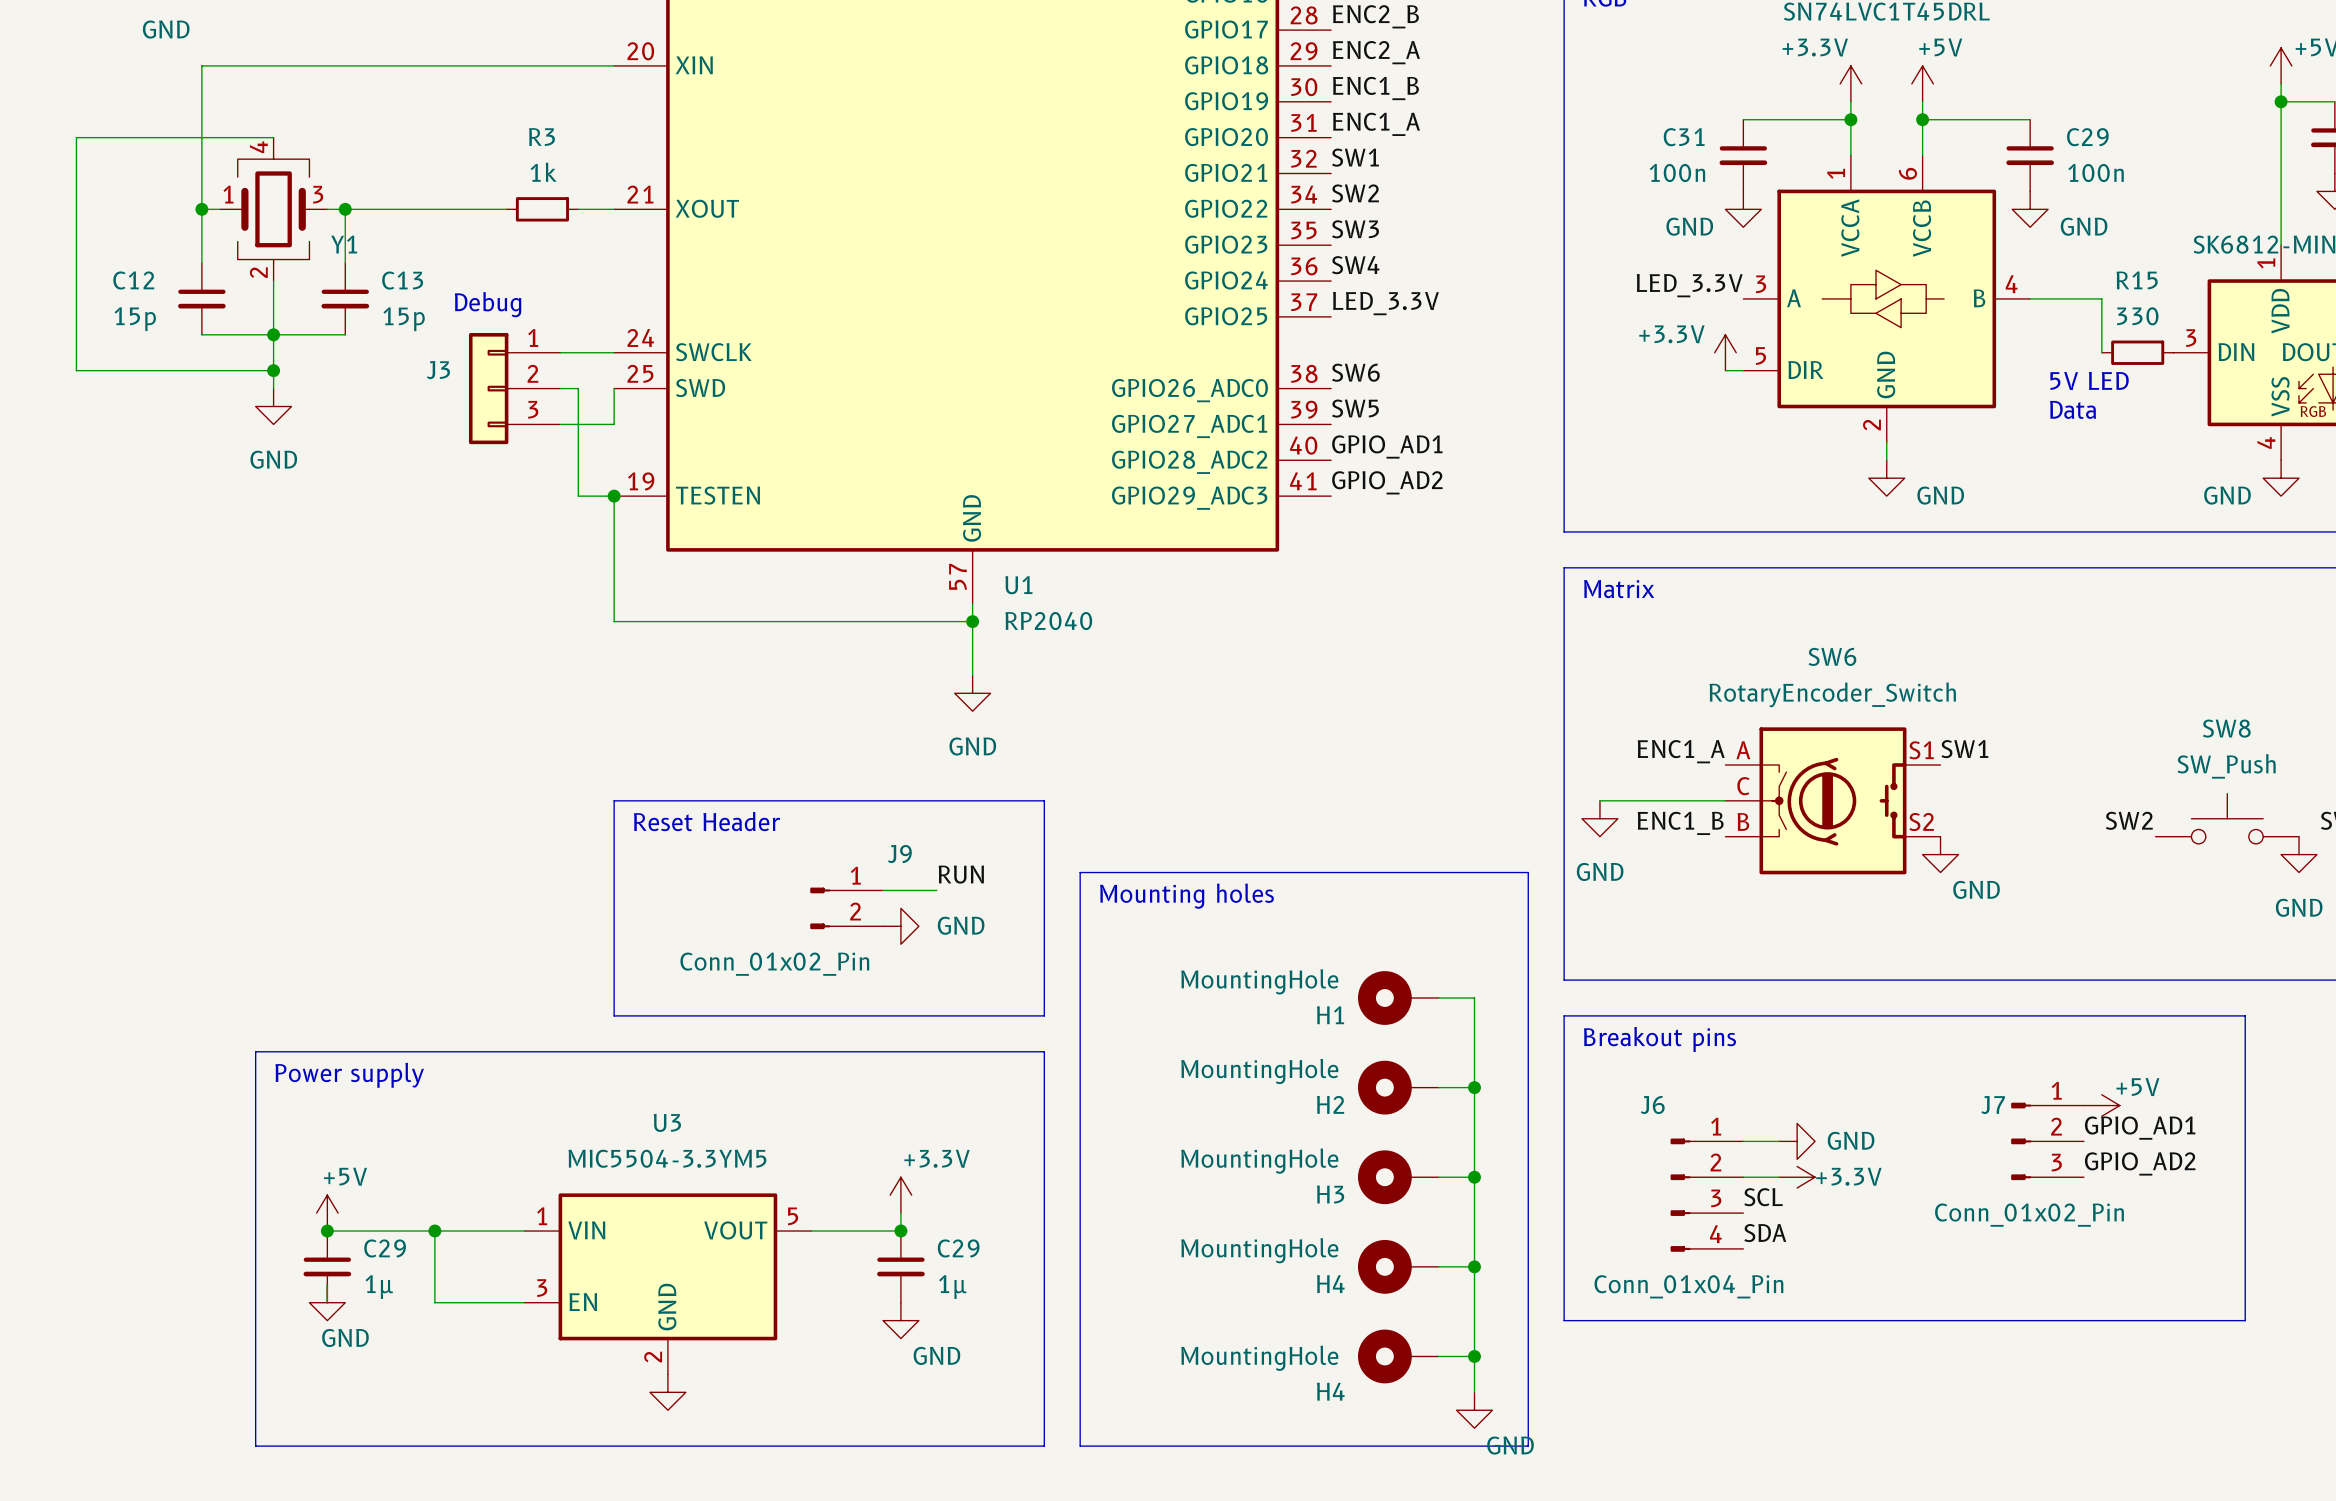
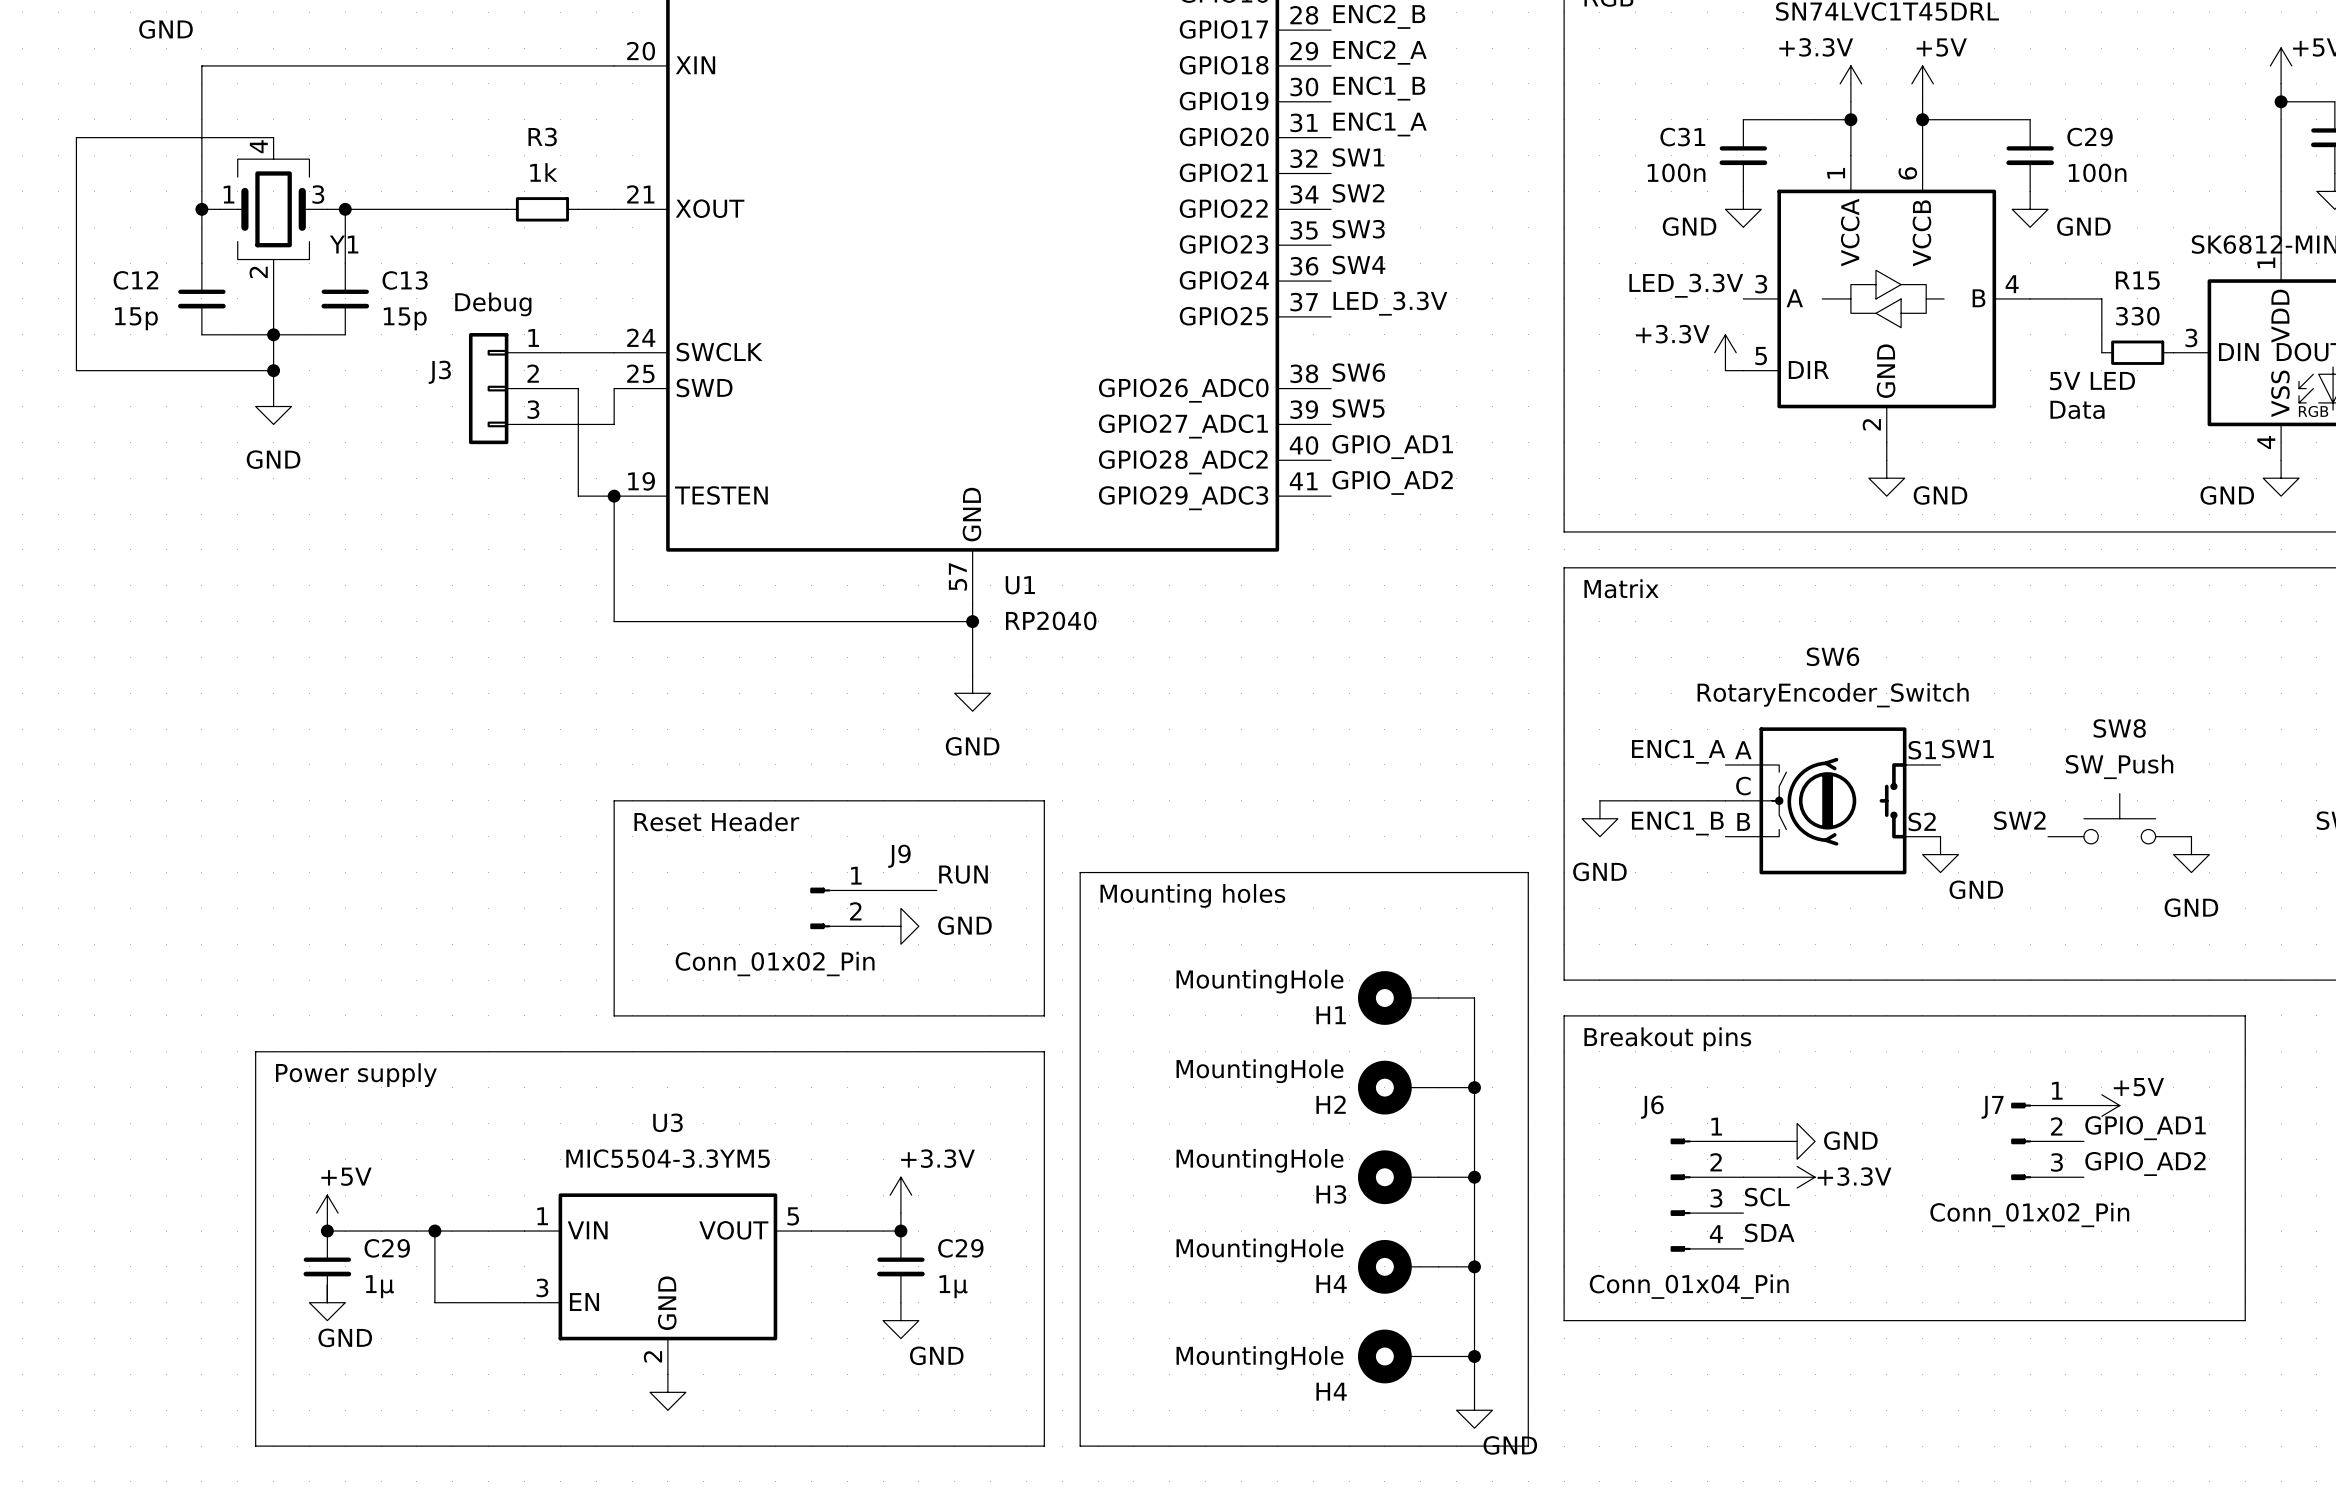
SW8 position: (2227, 818) -> (2119, 818)
label position: SW2 (2129, 820) -> SW2 (2019, 820)
power symbol: none -> GND (2191, 854)
power symbol: GND (2299, 854) -> none

